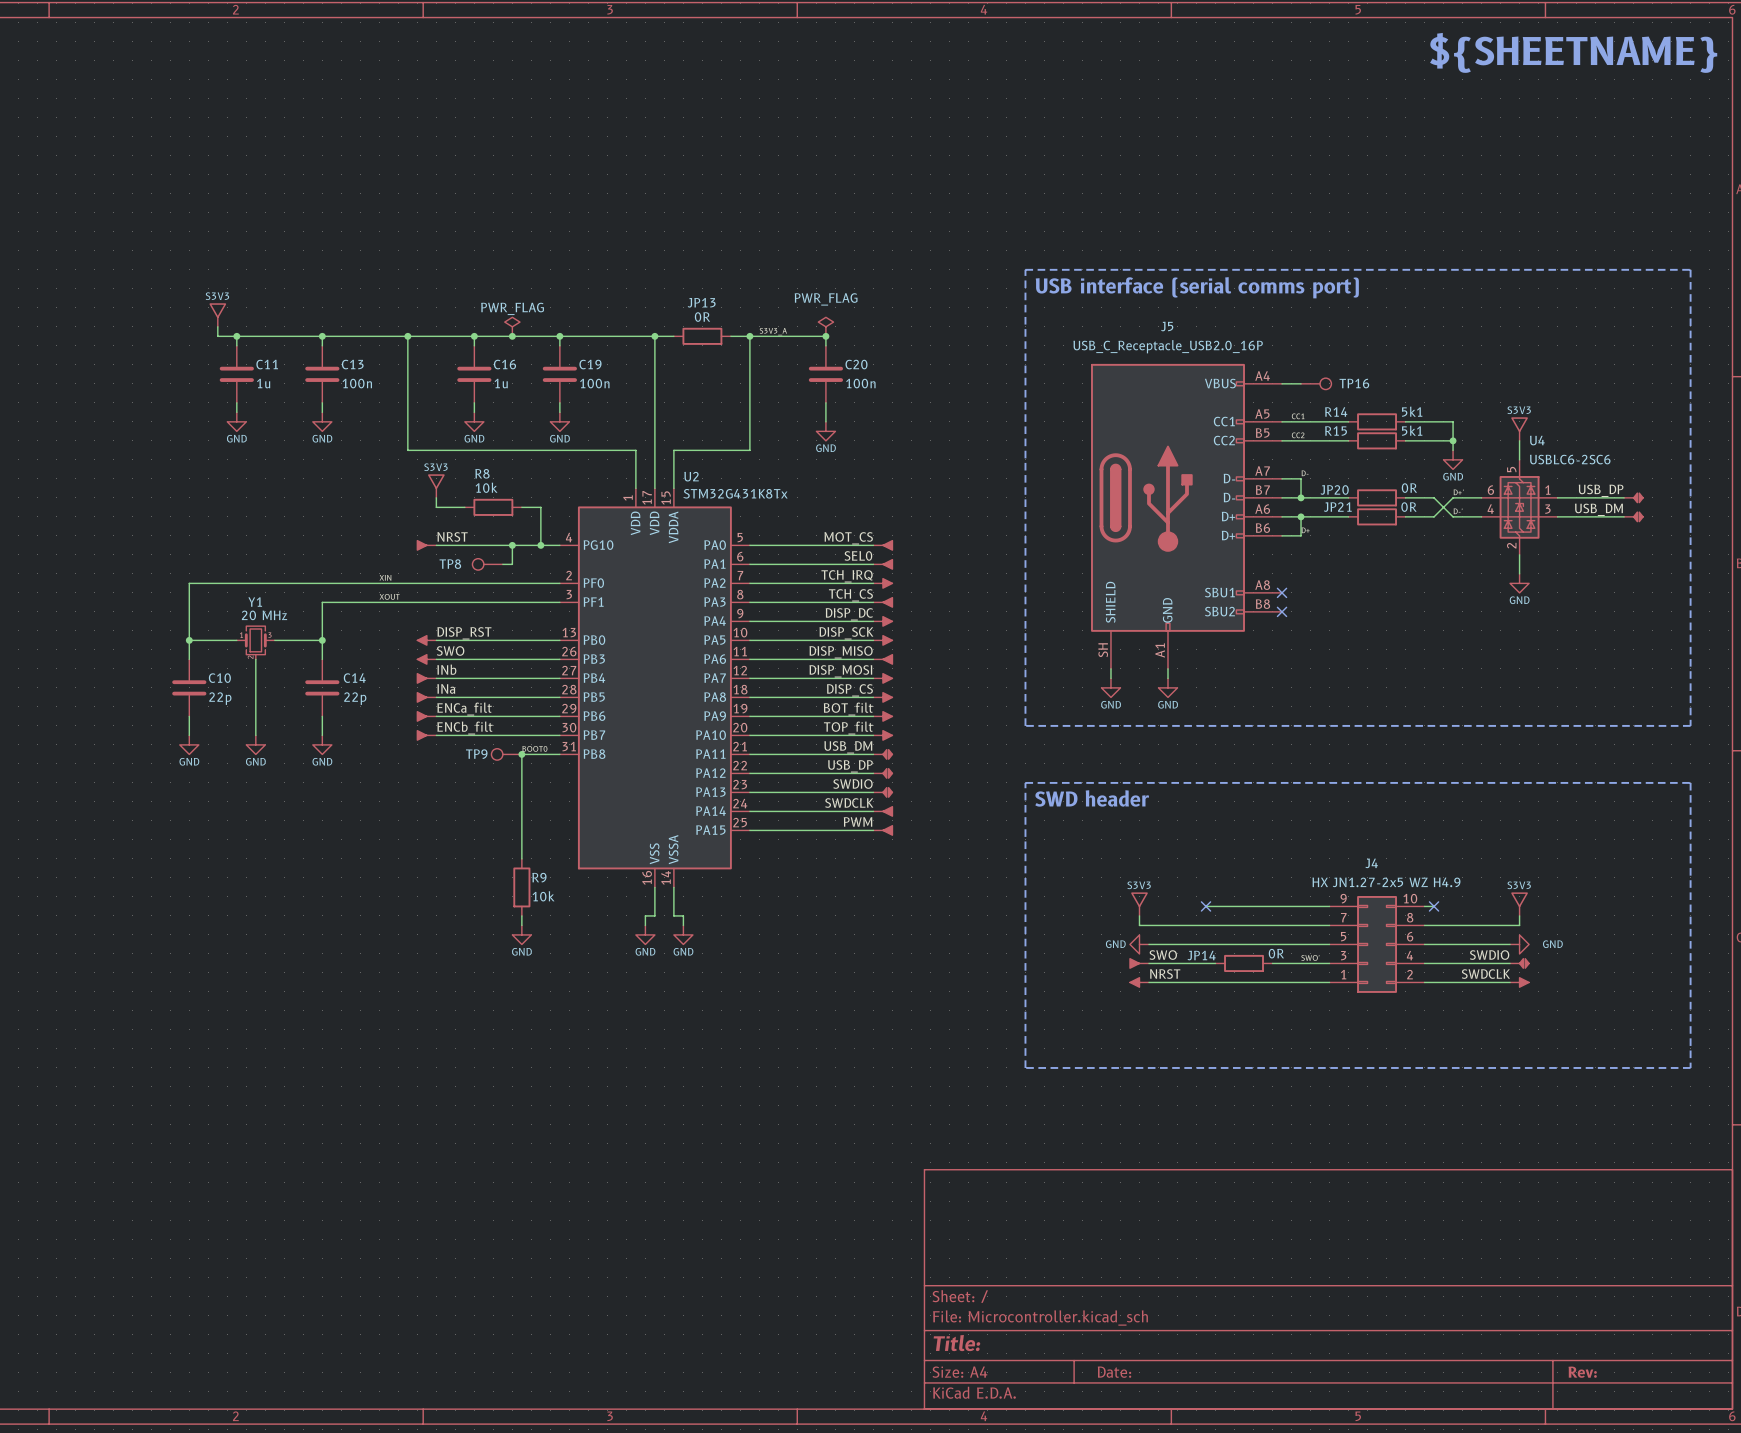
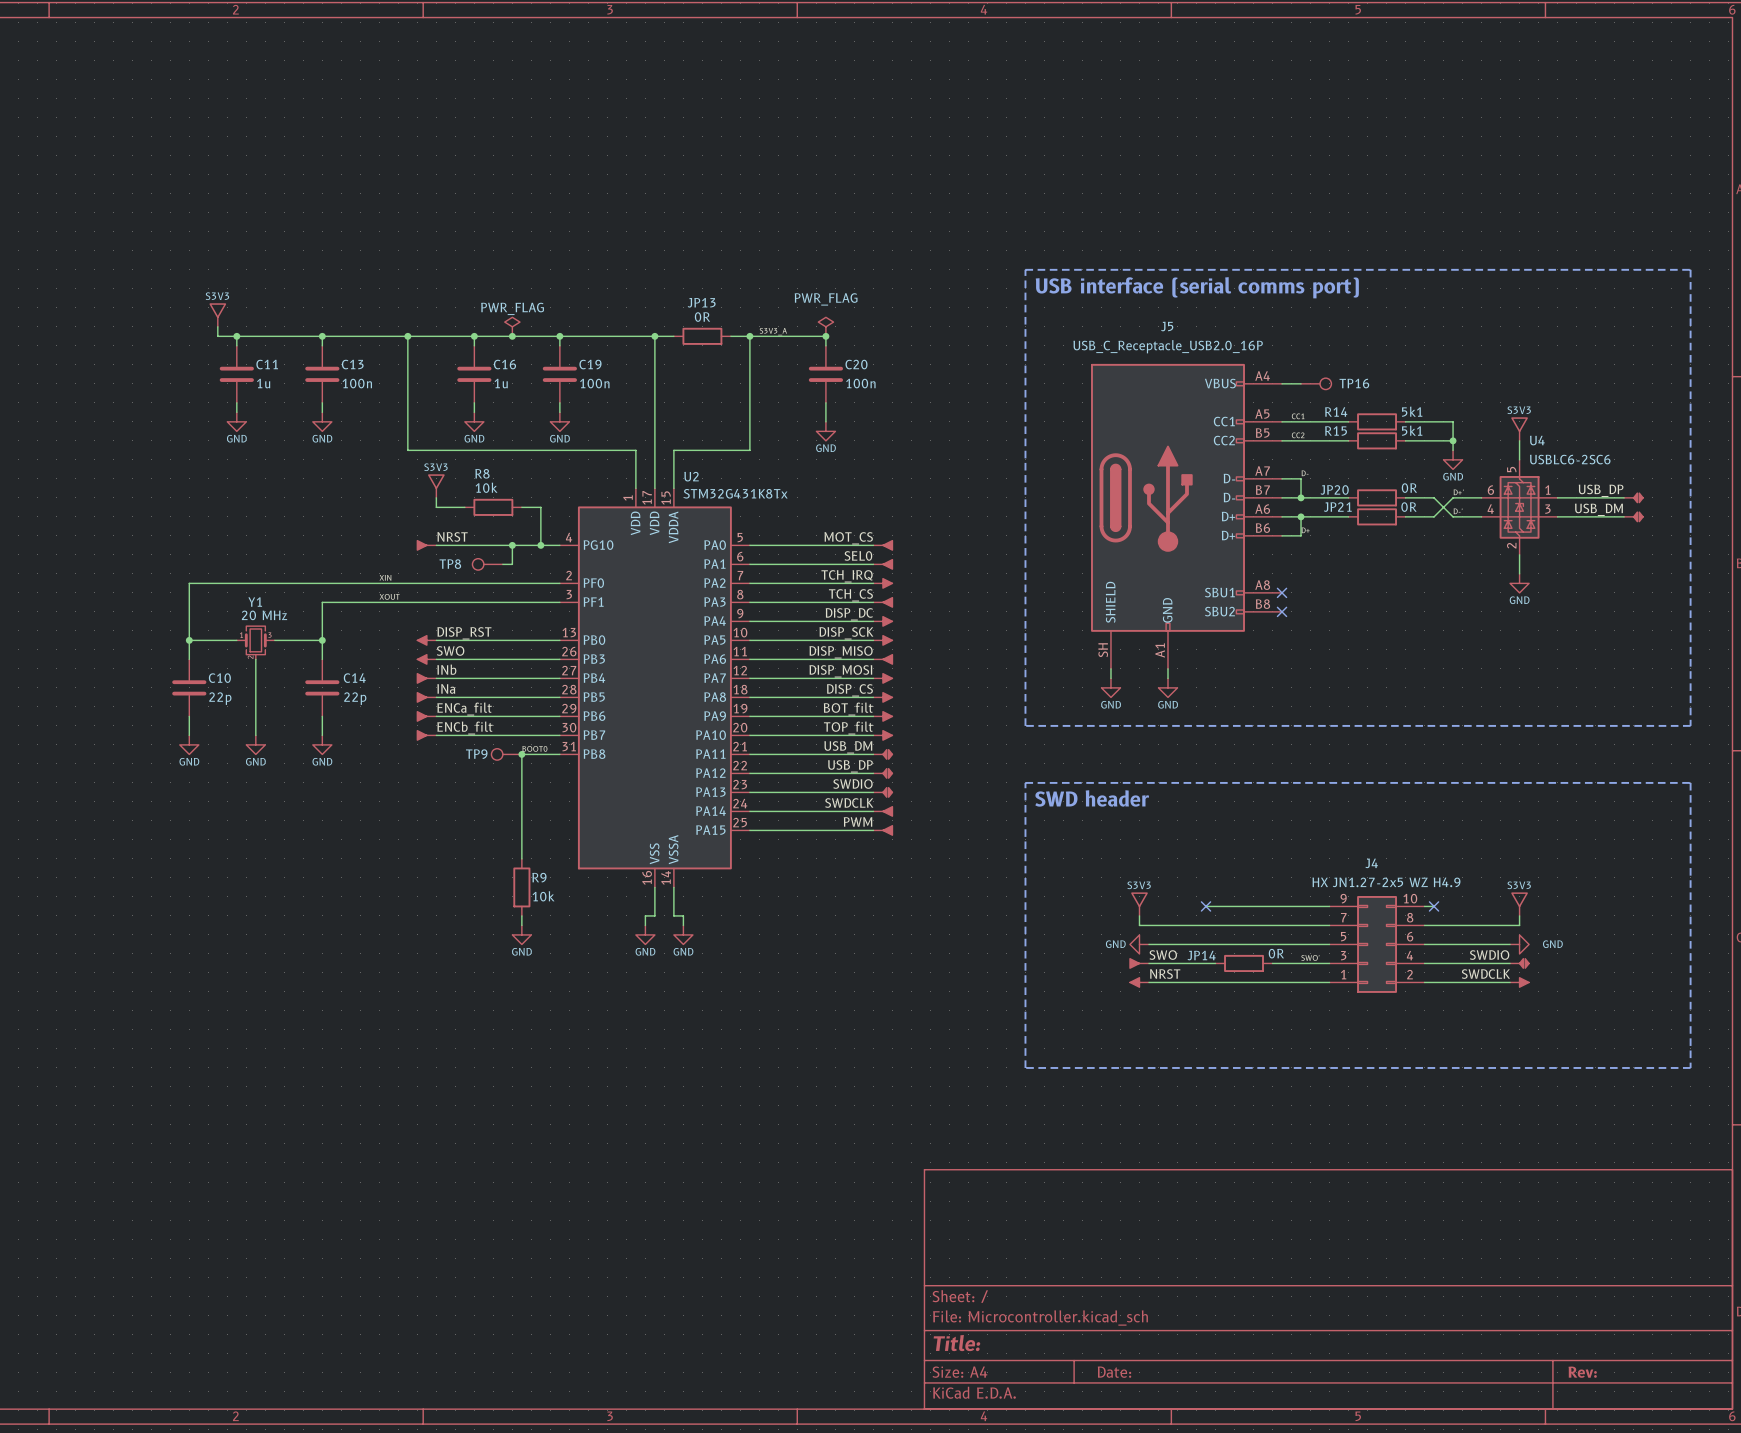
text: ${SHEETNAME} (1573, 52) -> none

